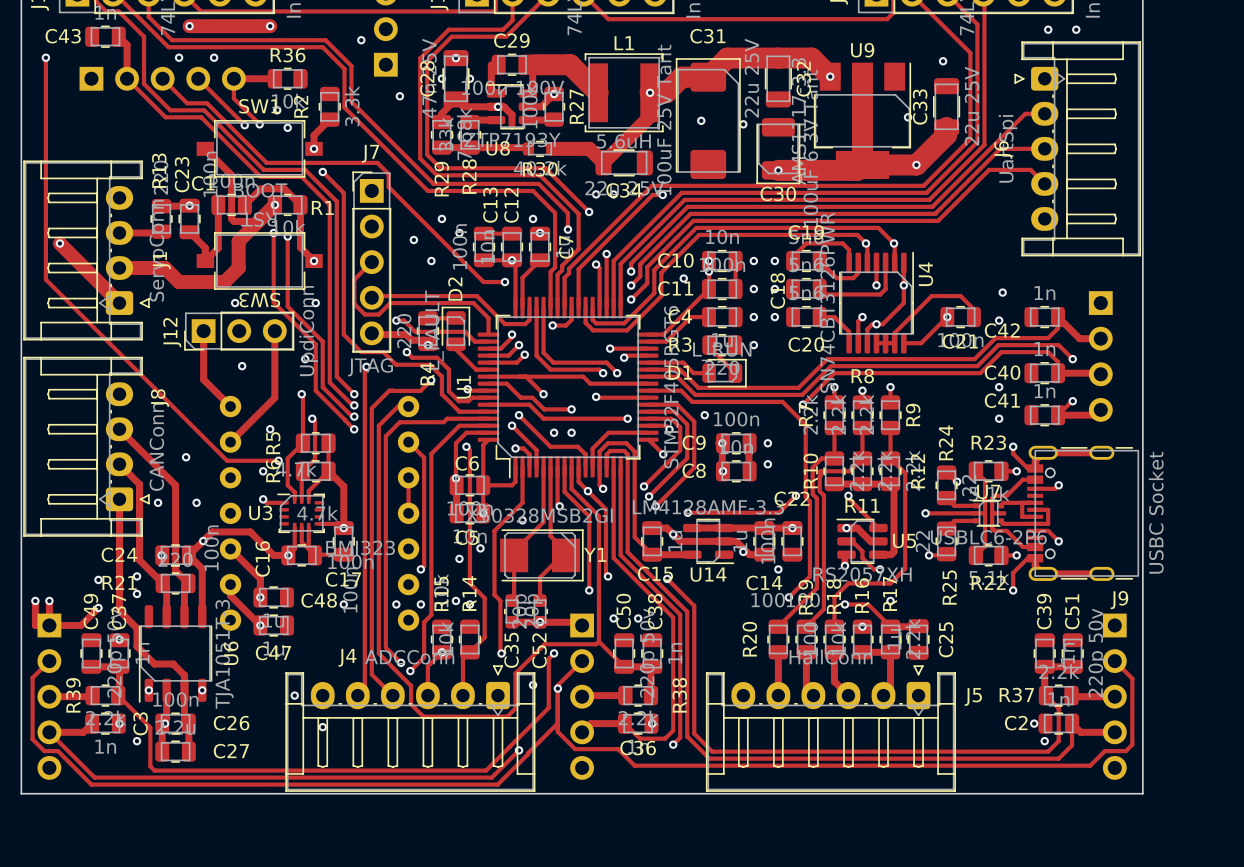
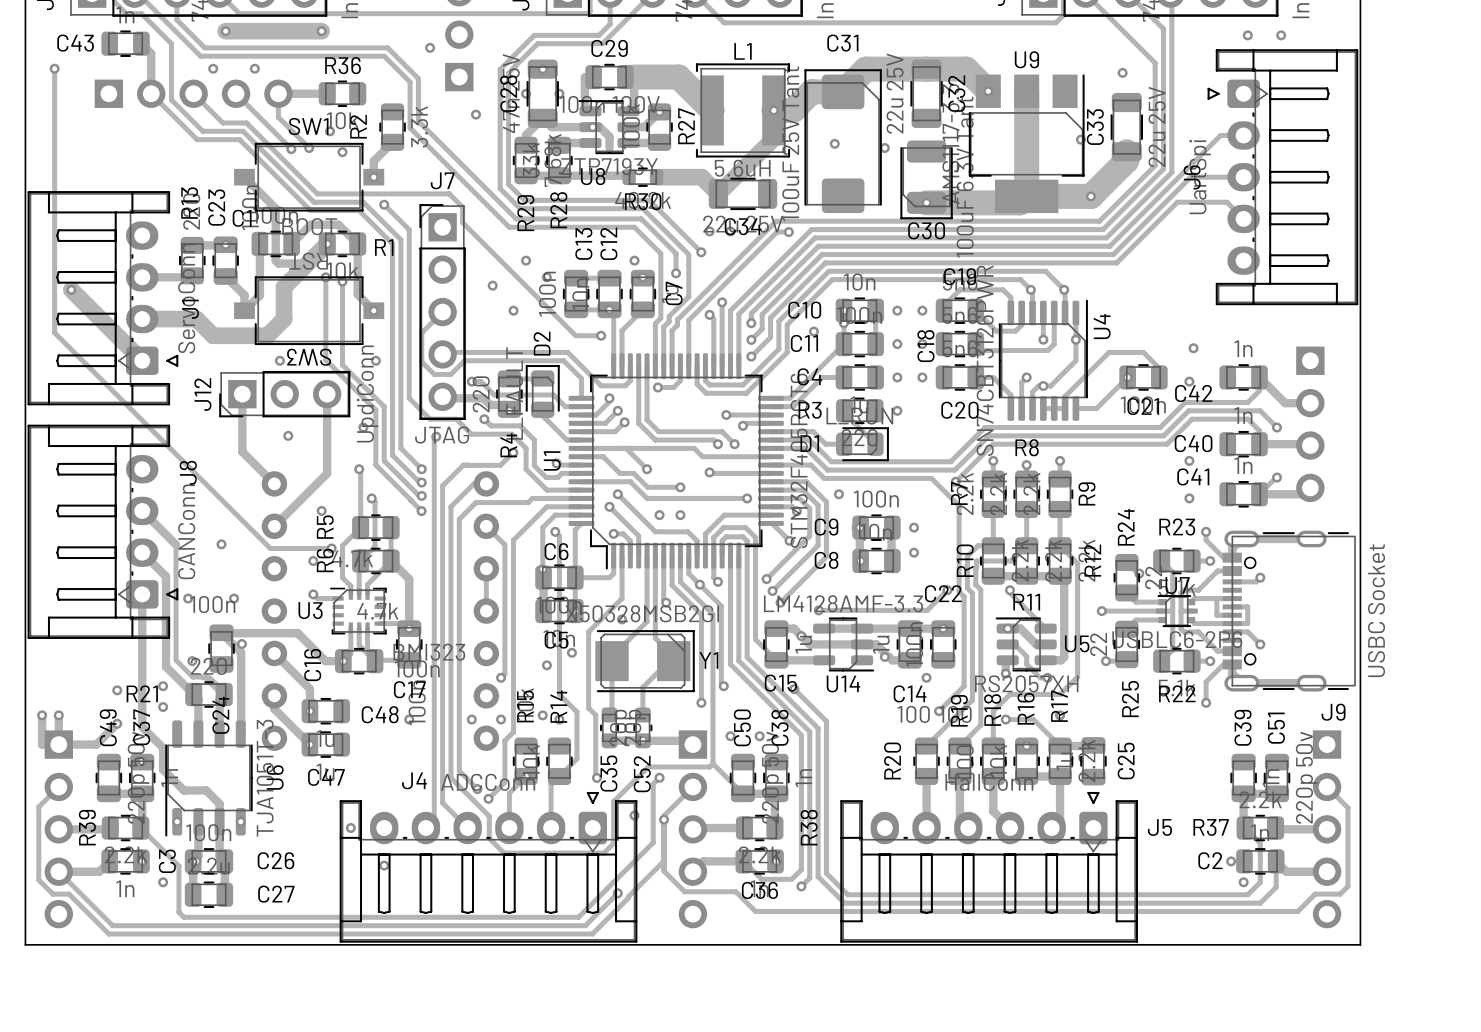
track: (147, 457) (175, 485) (175, 570) -> (176, 544) (176, 660) (192, 676) (209, 679)
track: none -> (221, 633) (252, 633)
track: (212, 531) (188, 555) (202, 568) (202, 616) -> (221, 632) (241, 652) (240, 734)
C24 value position: 100n (211, 548) -> 100n (212, 604)
C24 name position: C24 (119, 554) -> C24 (220, 715)
C24 rotation: 0° (175, 555) -> 90° clockwise (221, 648)

